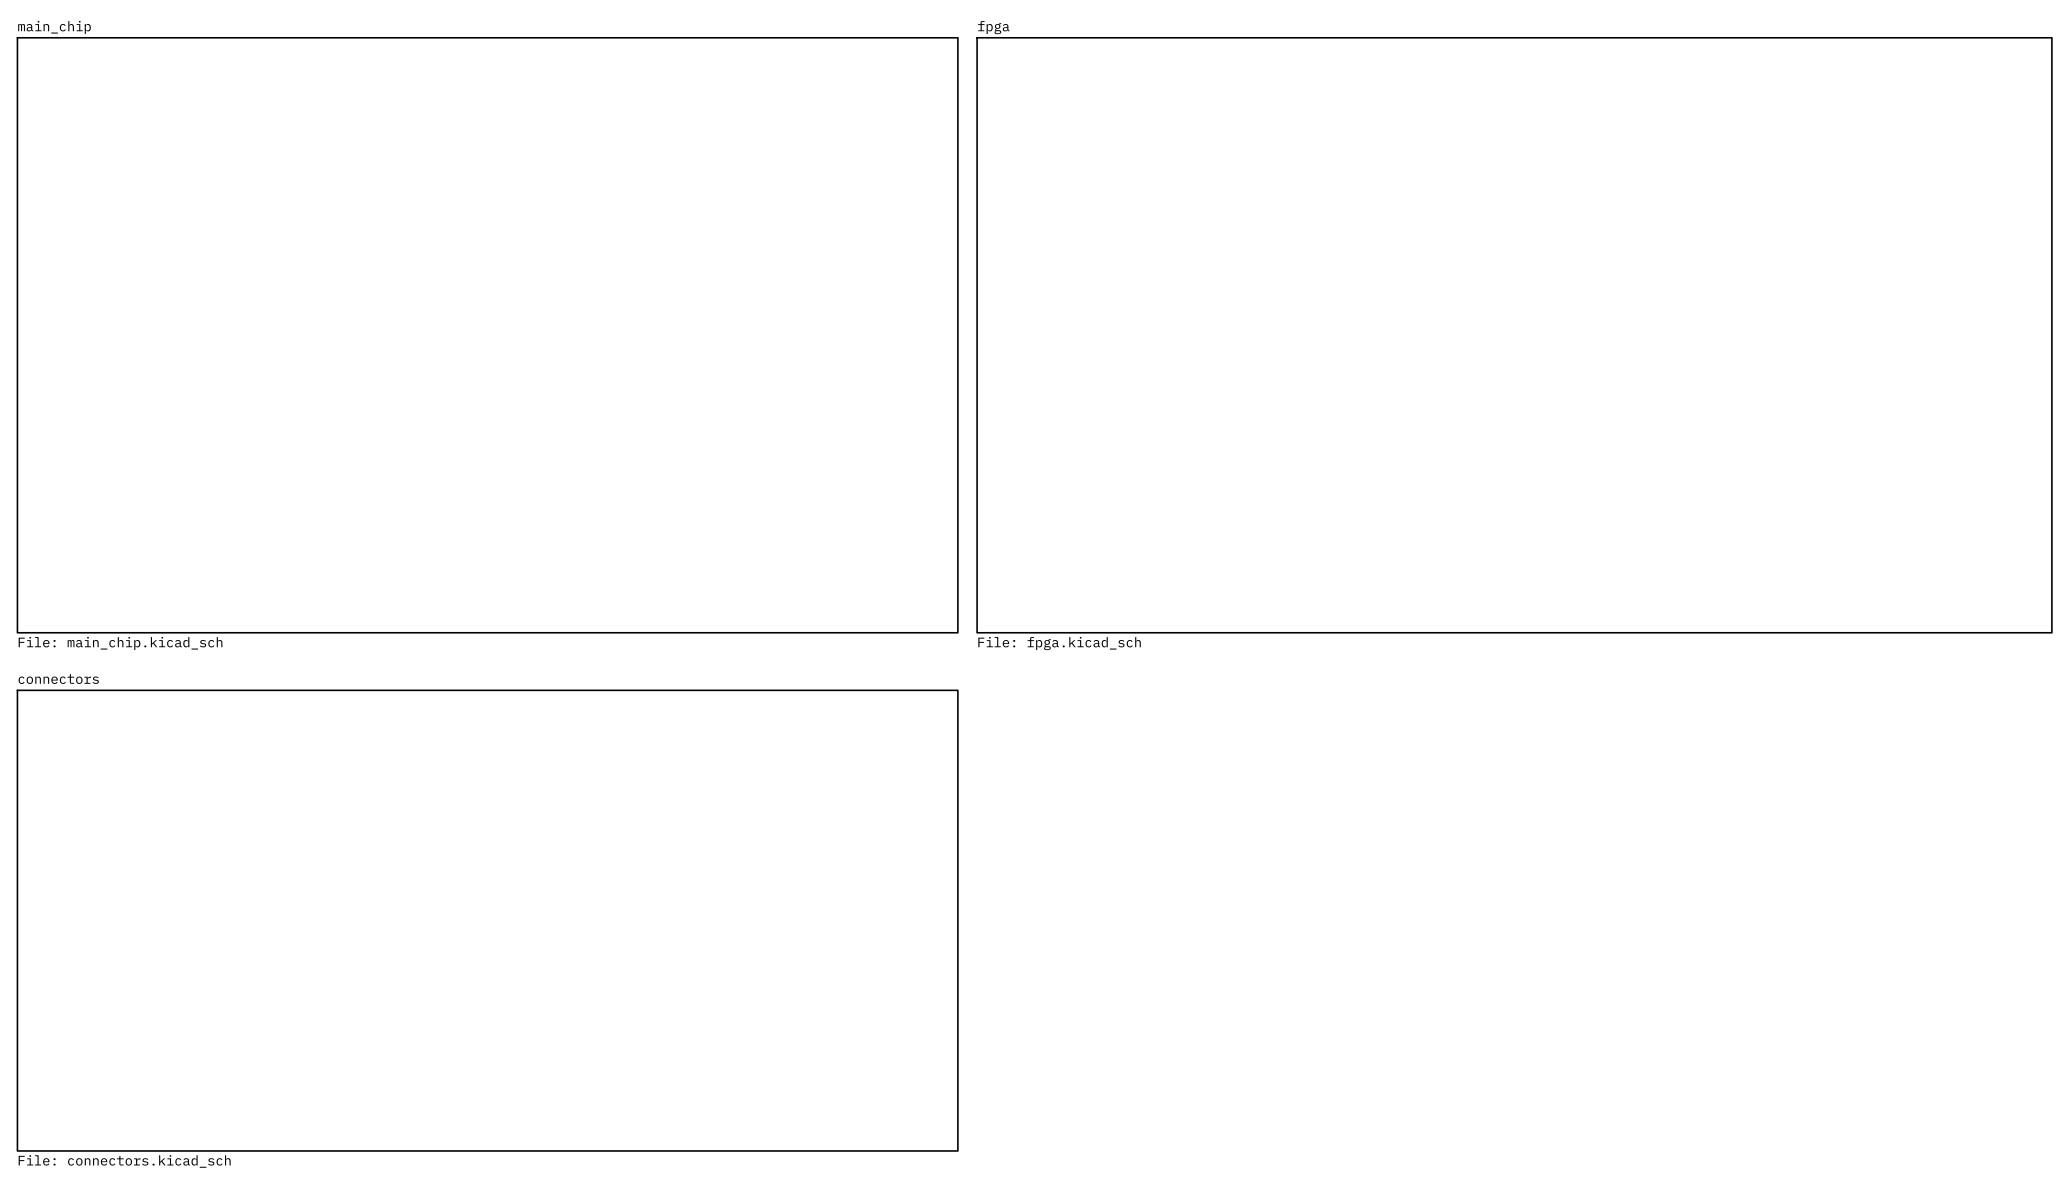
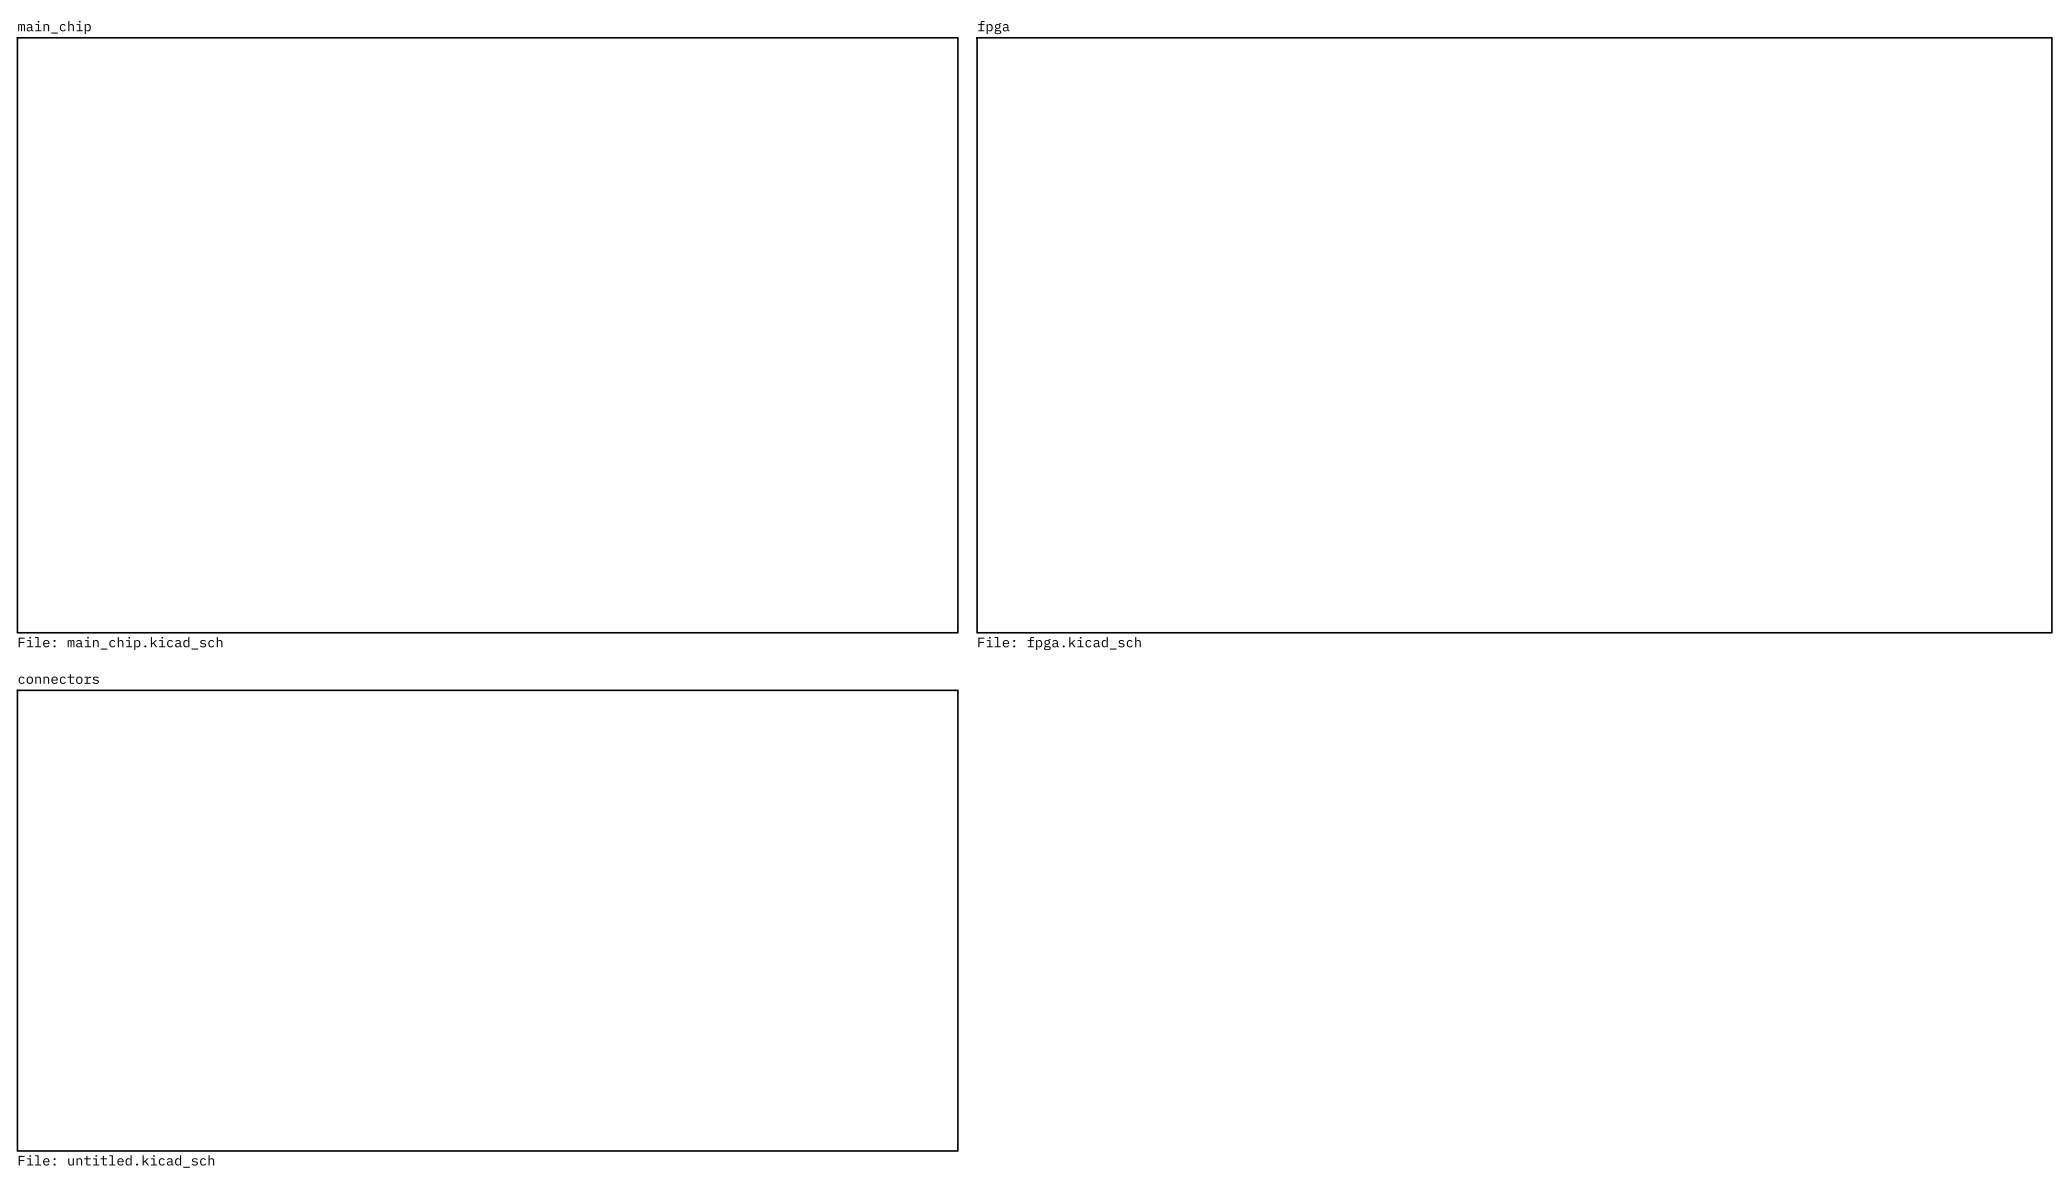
sheet connectors value: File: connectors.kicad_sch (124, 1161) -> File: untitled.kicad_sch (116, 1161)

